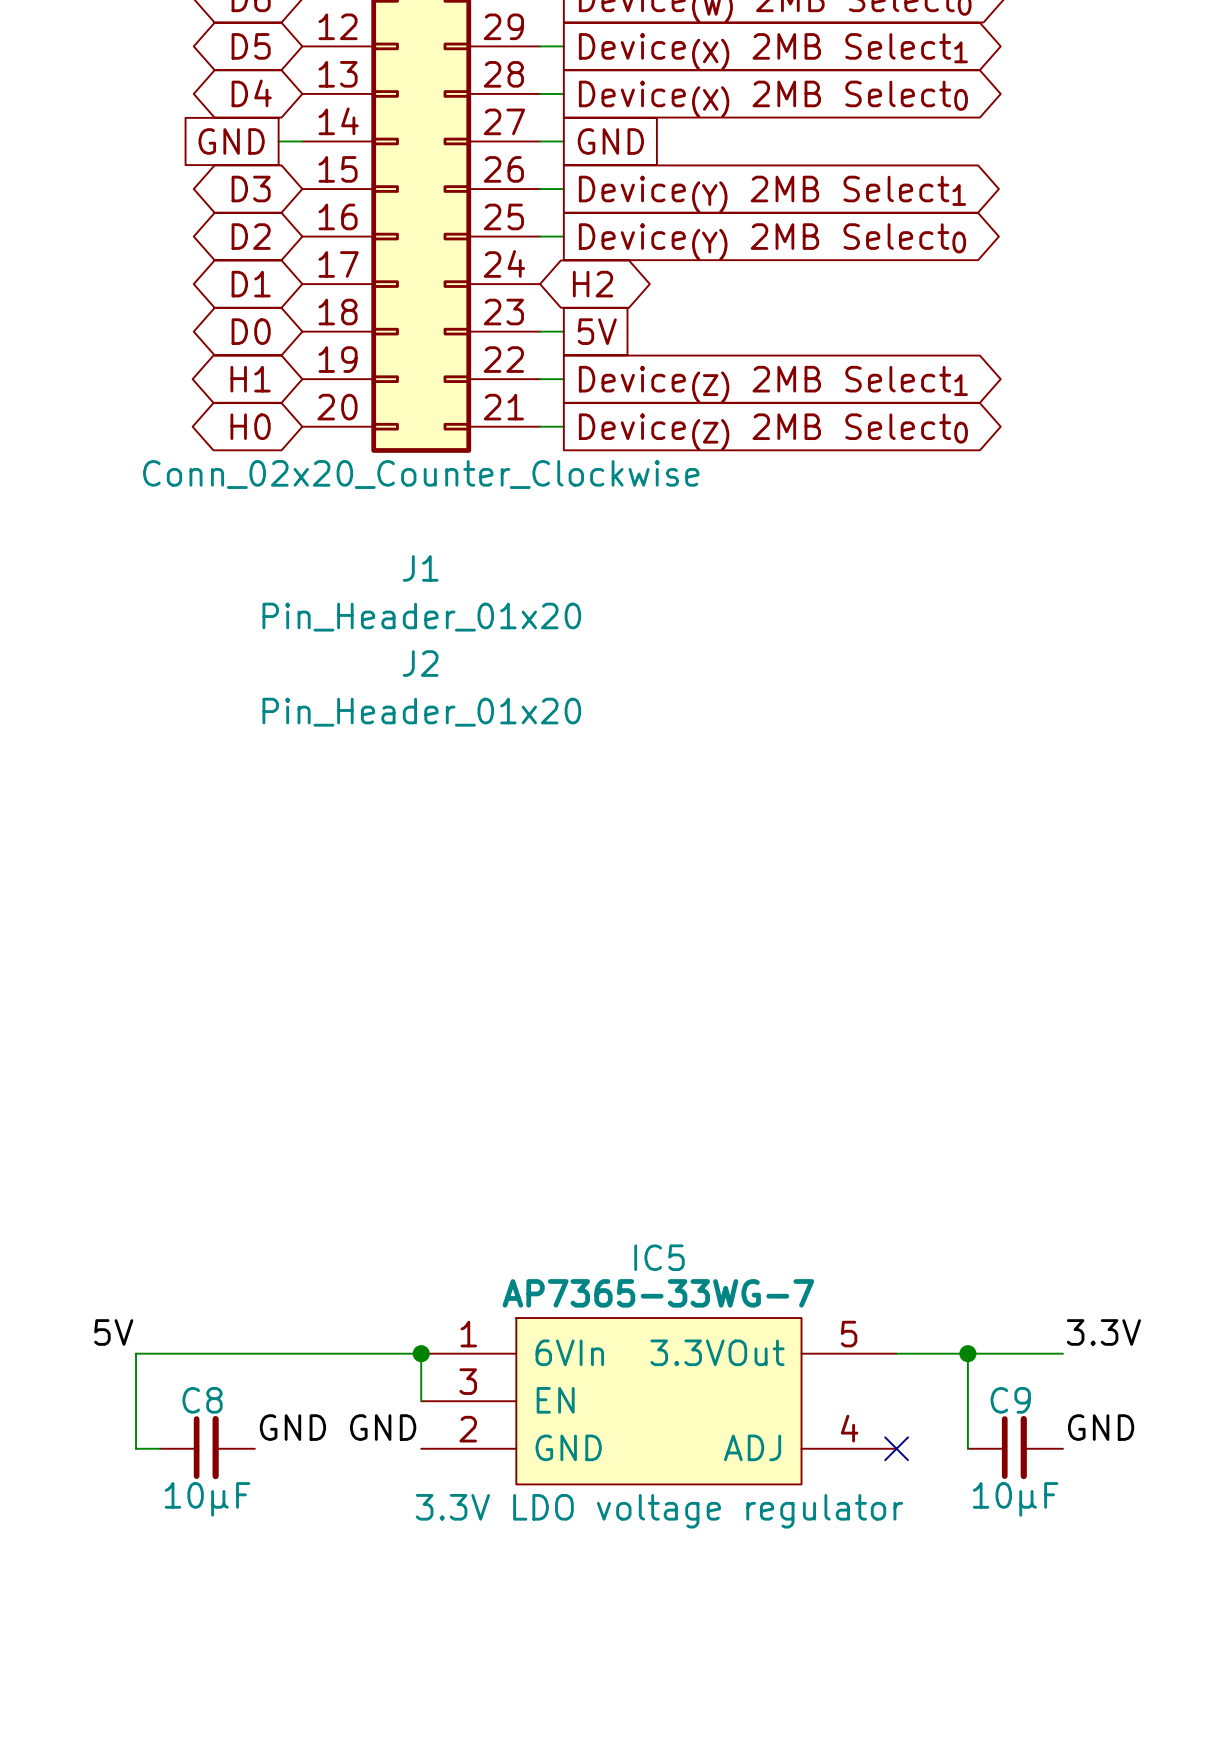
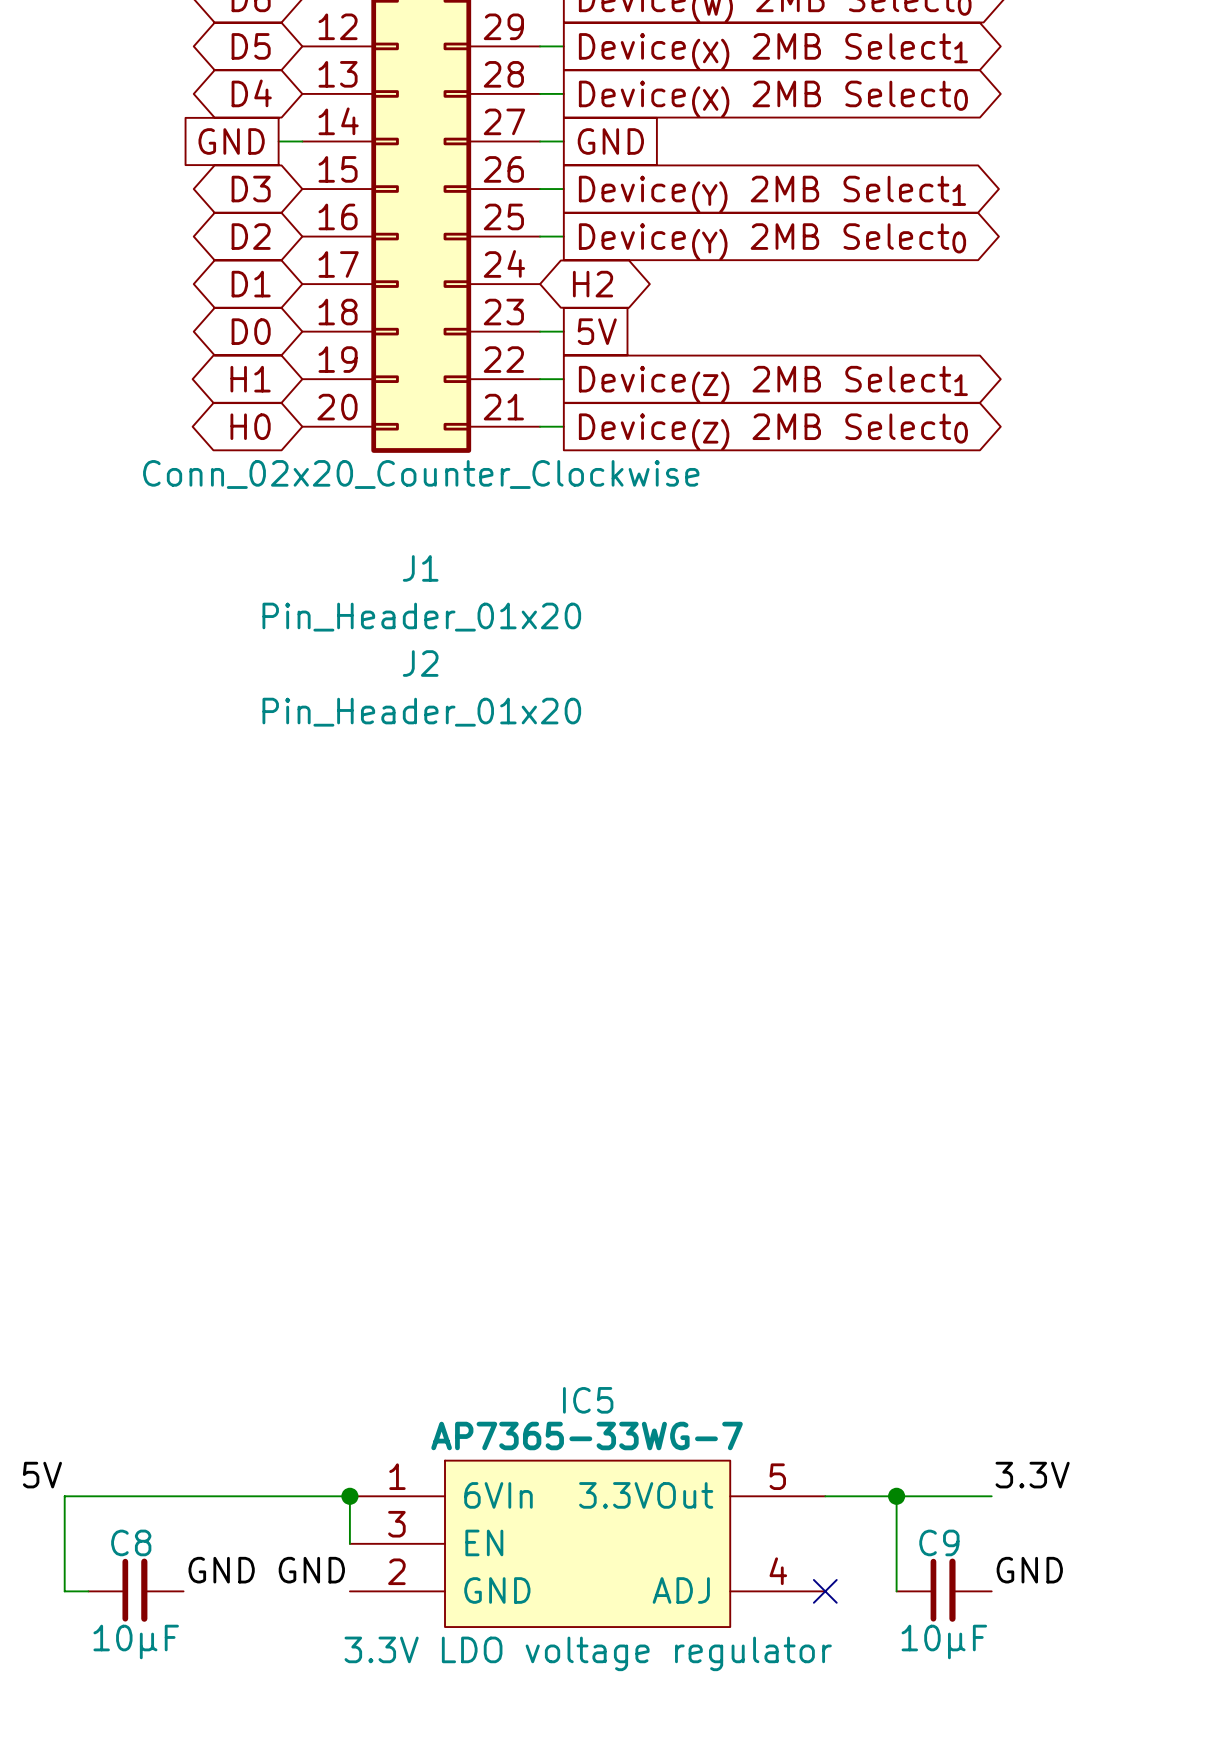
label position: 5V (113, 1332) -> 5V (42, 1475)
label position: 3.3V (1103, 1332) -> 3.3V (1032, 1475)
junction: (421, 1353) -> none
wire: (896, 1353) (1062, 1353) -> (825, 1496) (991, 1496)
wire: (967, 1353) (967, 1448) -> (896, 1496) (896, 1591)
junction: (967, 1353) -> none
wire: (421, 1401) (421, 1353) (136, 1353) (136, 1448) (159, 1448) -> (349, 1543) (349, 1496) (64, 1496) (64, 1591) (88, 1591)
IC5 position: (658, 1401) -> (587, 1543)
label: GND (292, 1427) -> none
label: GND (383, 1427) -> none
label position: GND (1101, 1427) -> GND (1029, 1570)
C8 position: (207, 1447) -> (136, 1590)
C9 position: (1015, 1447) -> (944, 1590)
no-connect mark: (896, 1448) -> none
junction: none -> (349, 1496)
junction: none -> (896, 1496)
label: none -> GND (221, 1570)
label: none -> GND (311, 1570)
no-connect mark: none -> (825, 1591)

